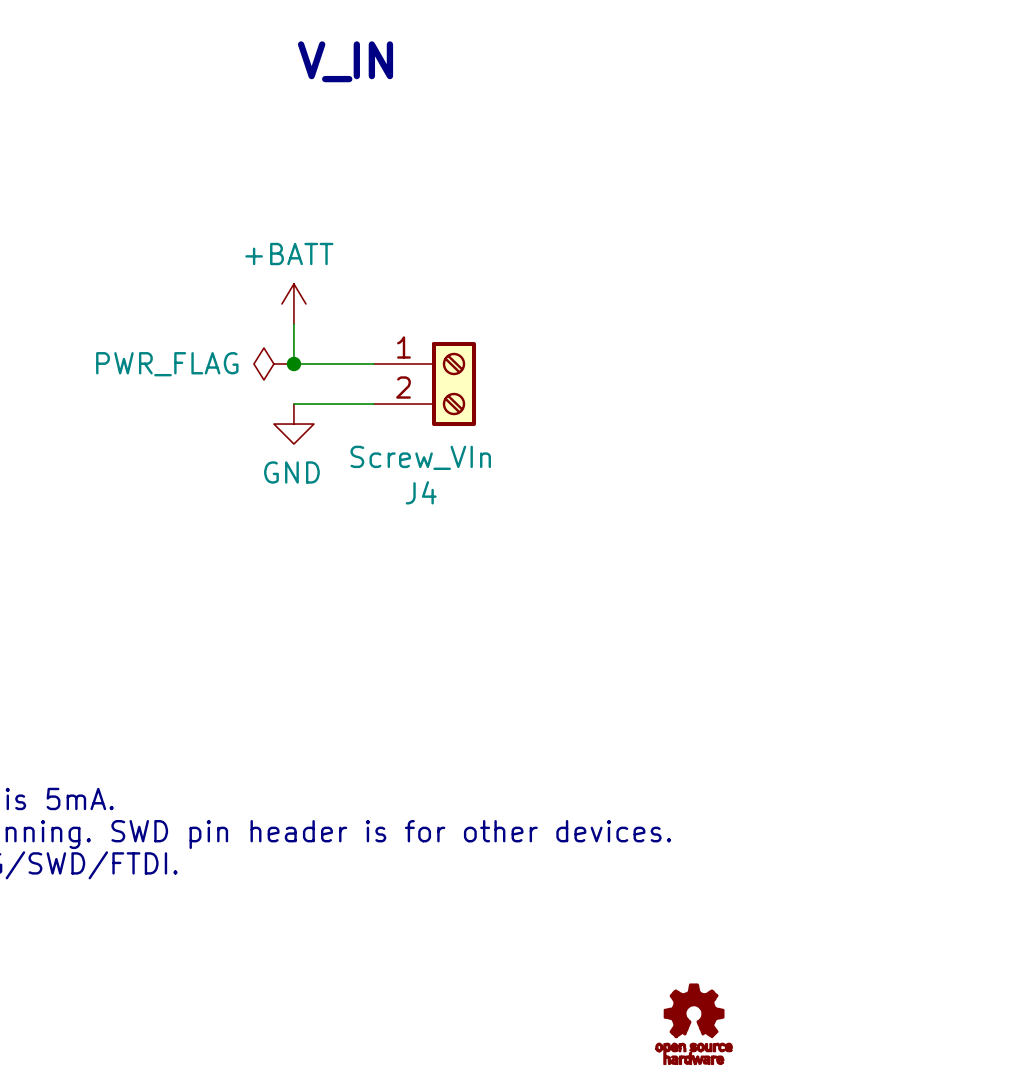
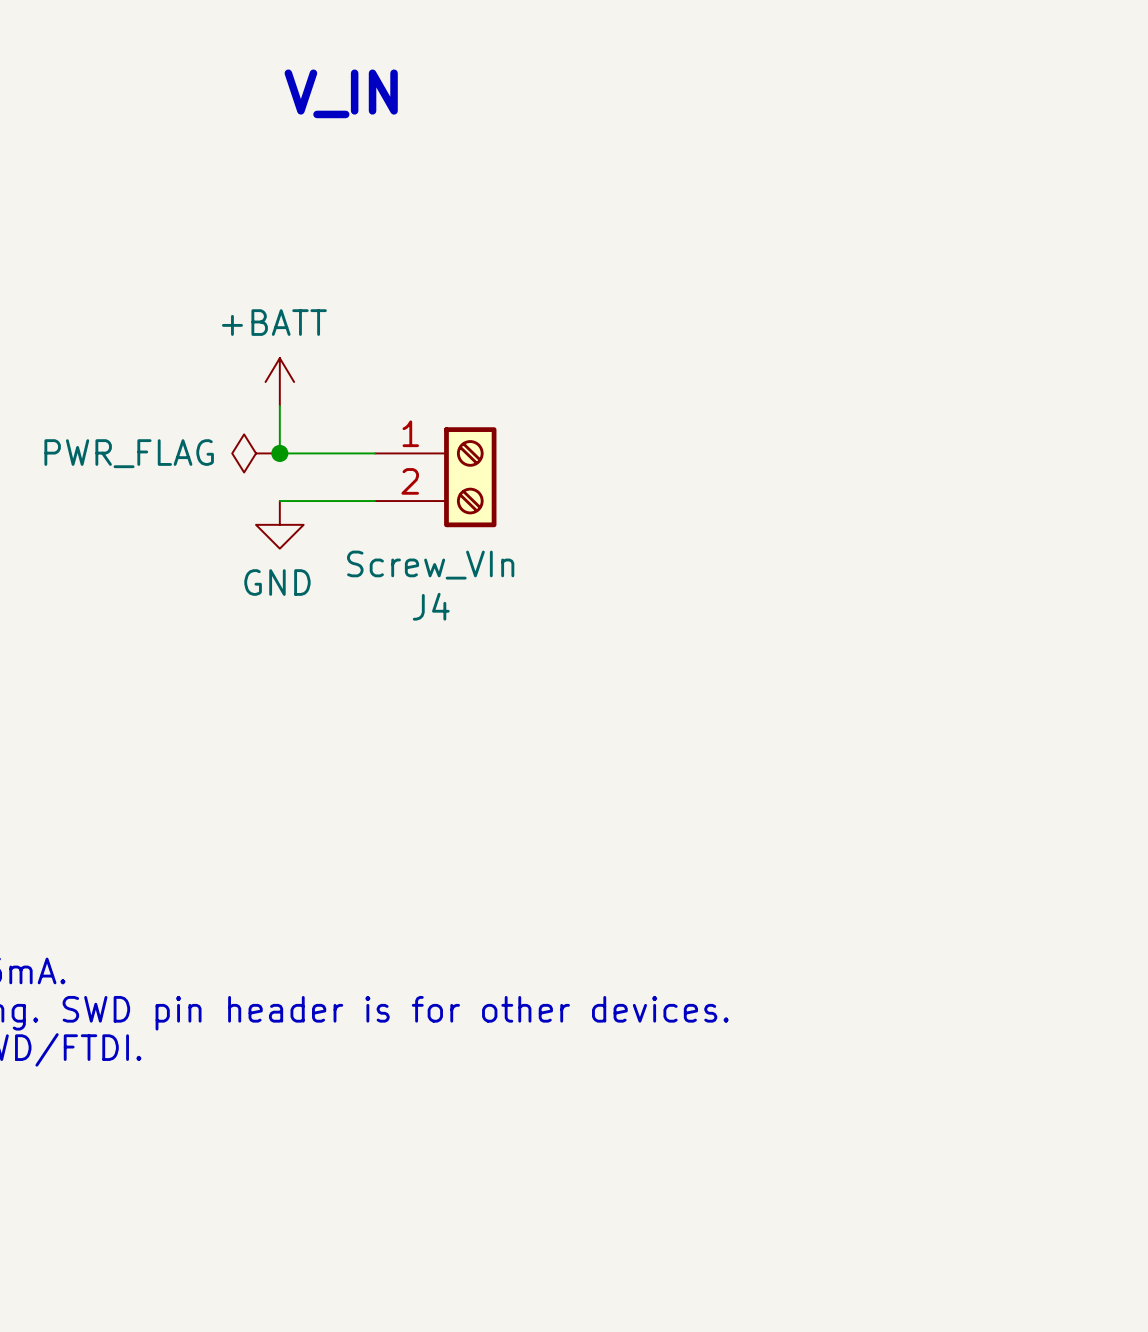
part: (694, 1024) -> none

